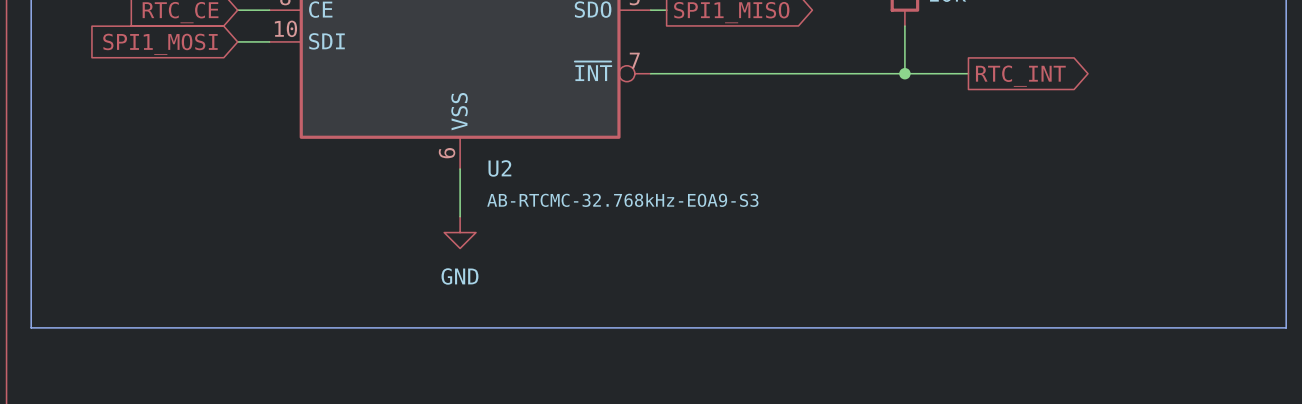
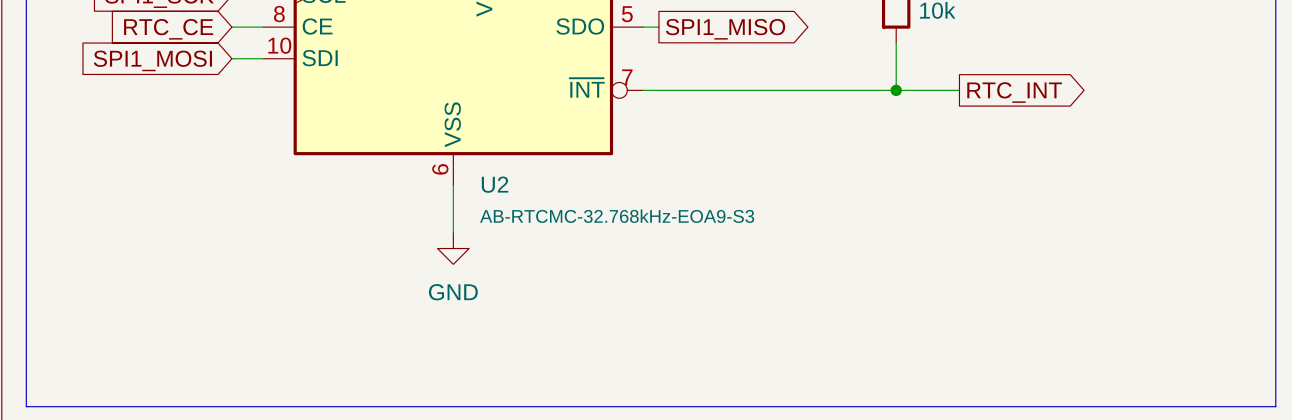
line: (31, 327) (1286, 327) -> (26, 343) (26, 406) (1275, 406) (1275, 343)

